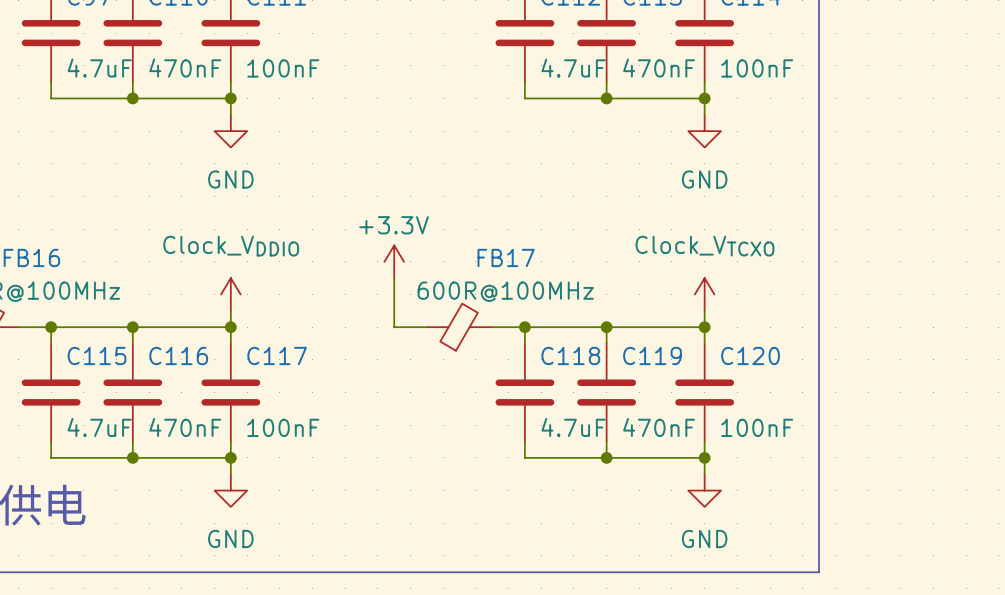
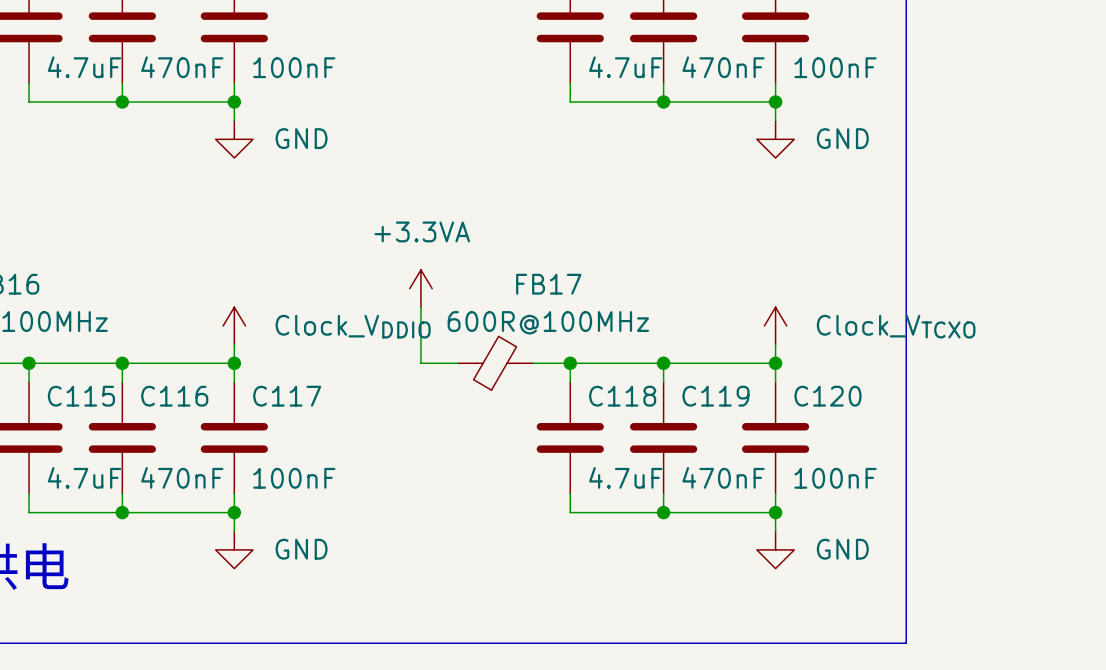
power symbol text position: GND (230, 179) -> GND (301, 138)
power symbol text position: GND (704, 179) -> GND (842, 138)
power symbol text position: Clock_VDDIO (231, 246) -> Clock_VDDIO (353, 326)
power symbol text position: Clock_VTCXO (704, 246) -> Clock_VTCXO (896, 326)
power symbol: +3.3V (394, 261) -> +3.3VA (420, 288)
power symbol text position: GND (230, 538) -> GND (301, 549)
power symbol text position: GND (704, 538) -> GND (842, 549)

